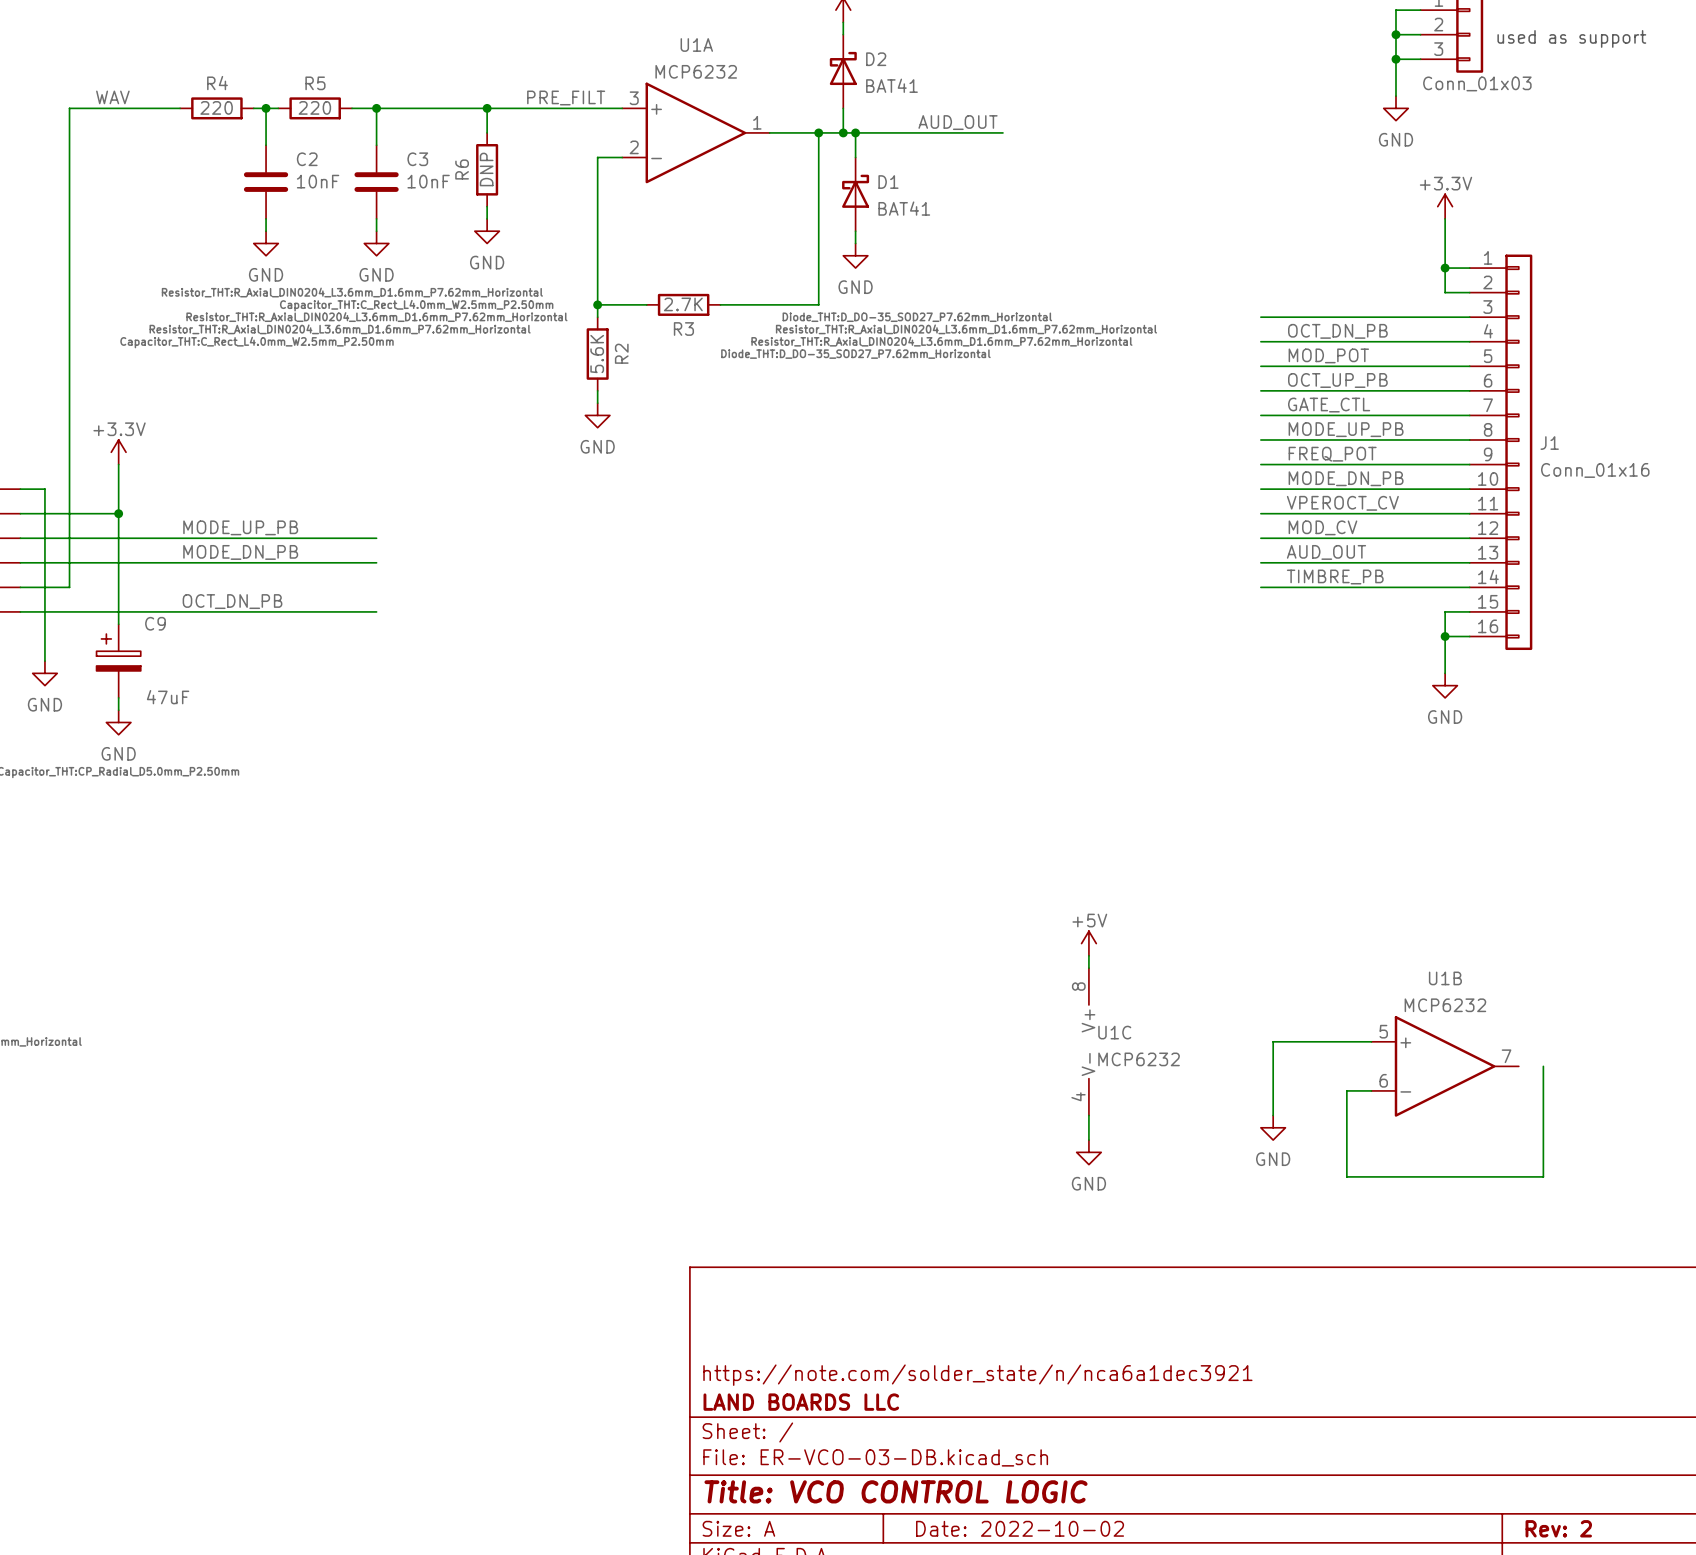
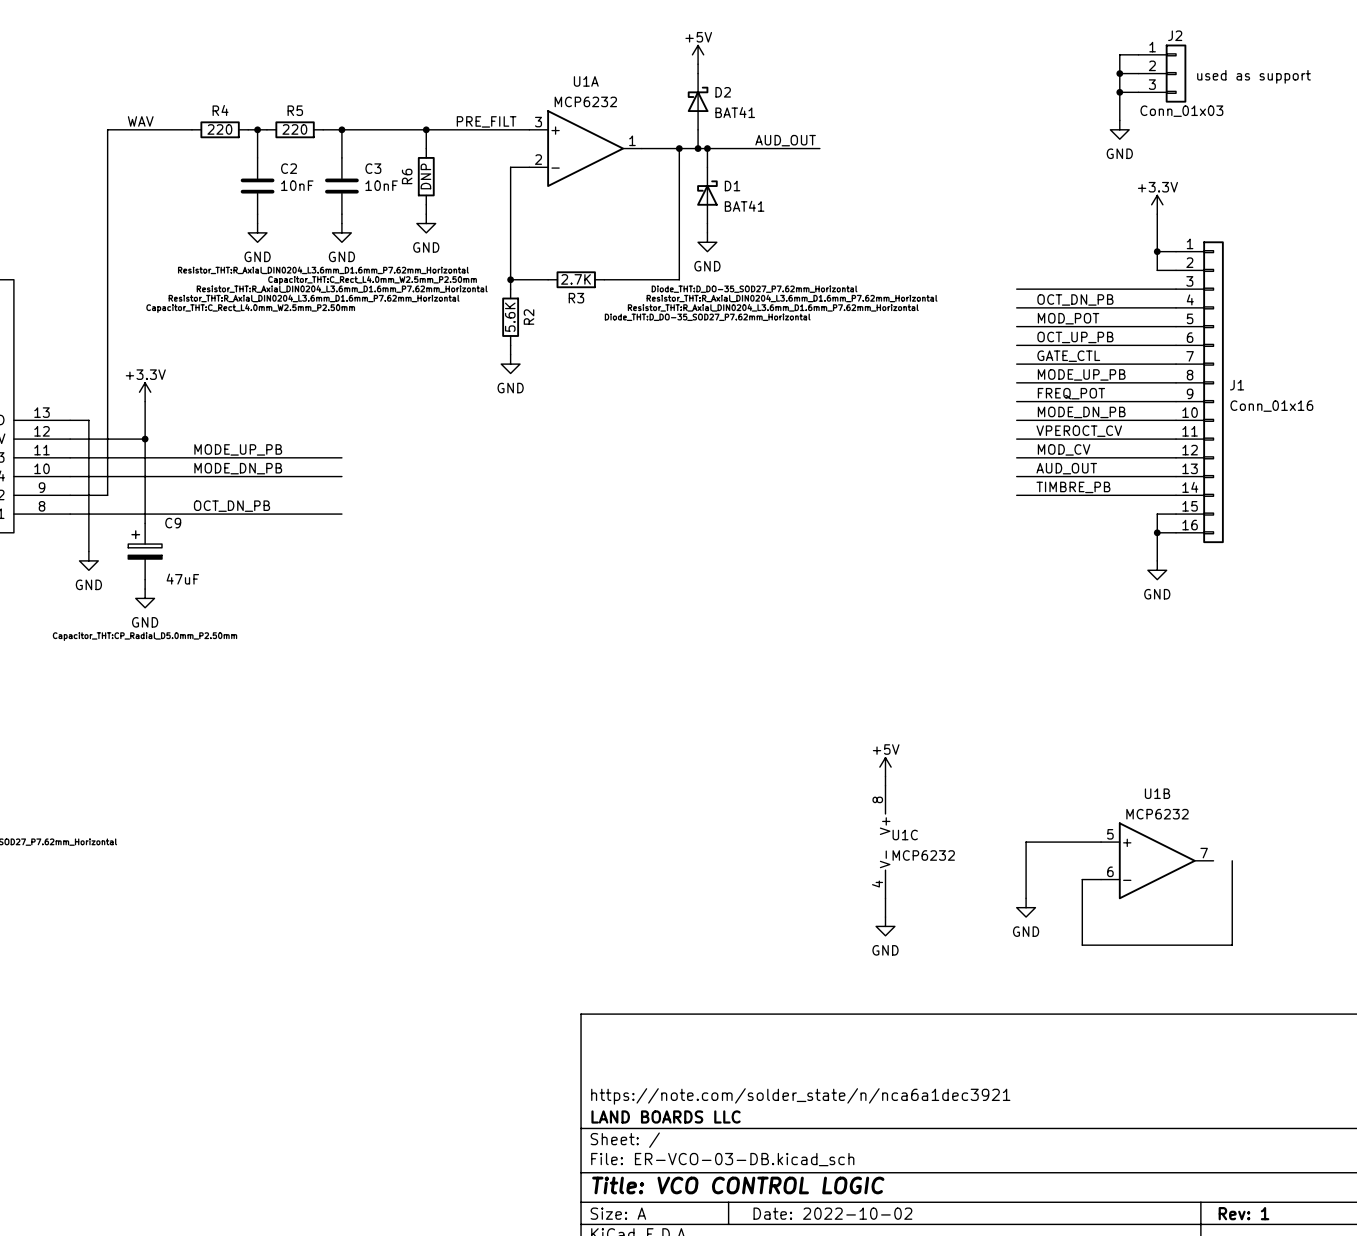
title block: Rev: 2 (1558, 1528) -> Rev: 1 (1243, 1213)

